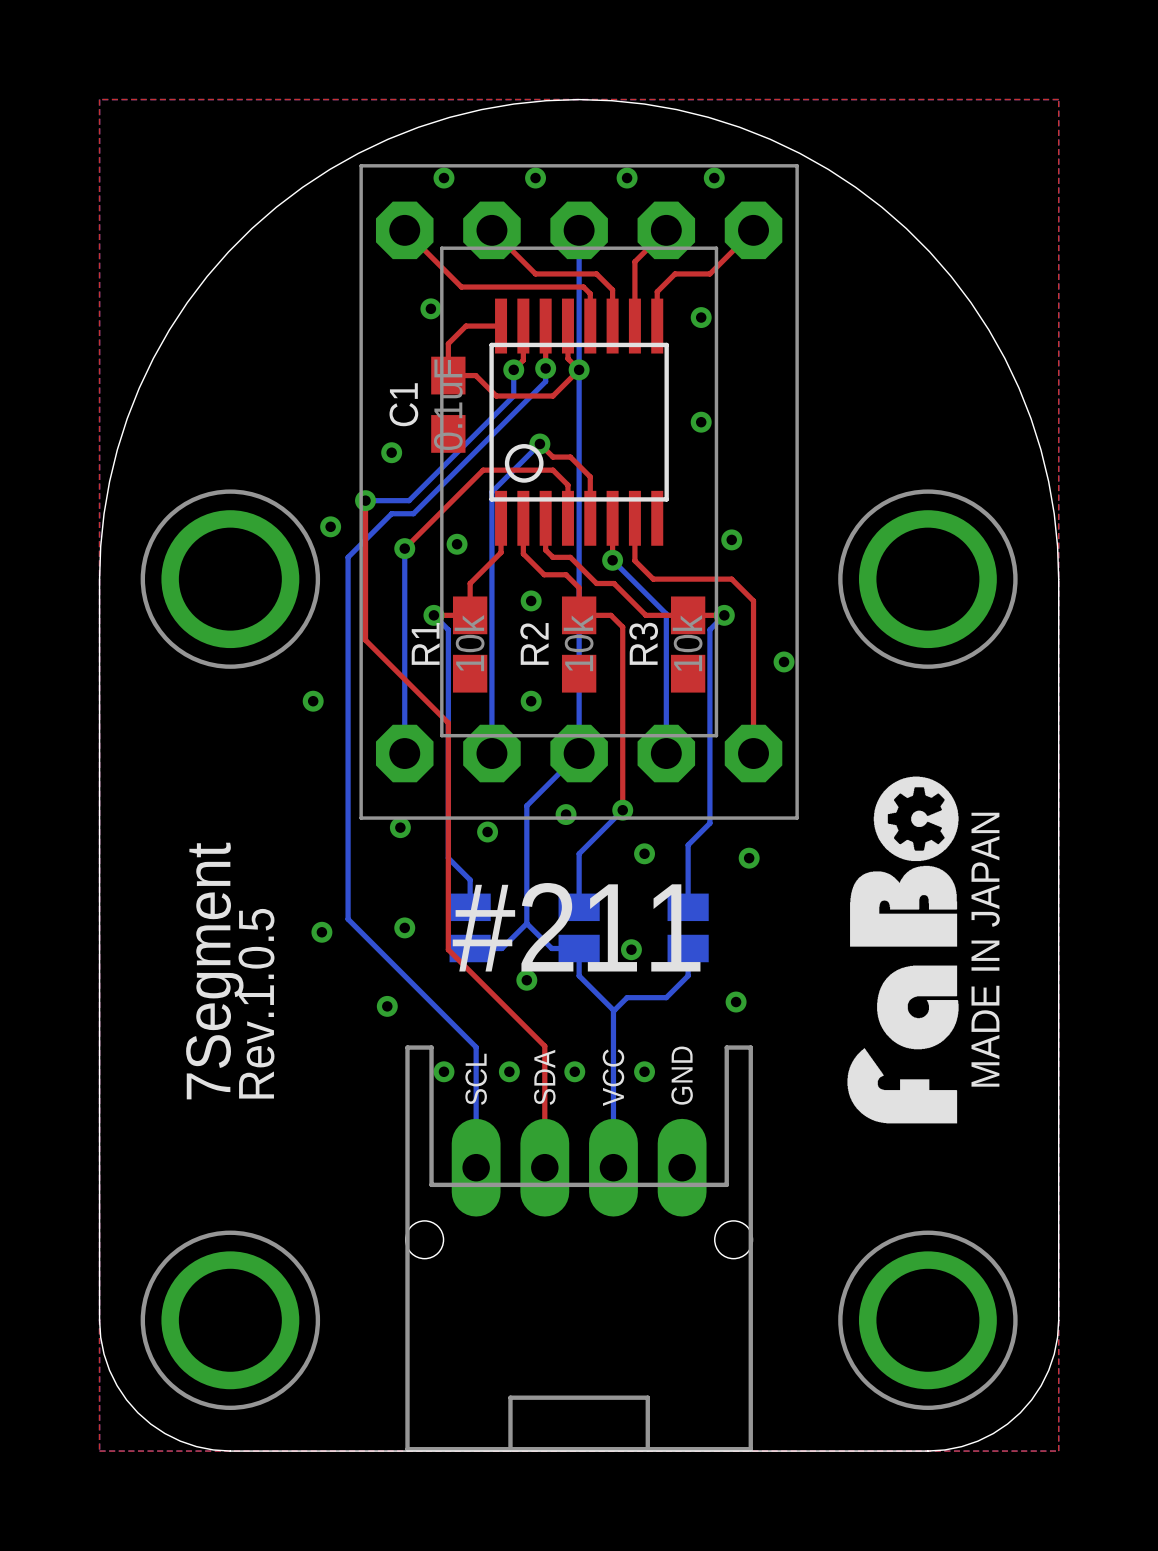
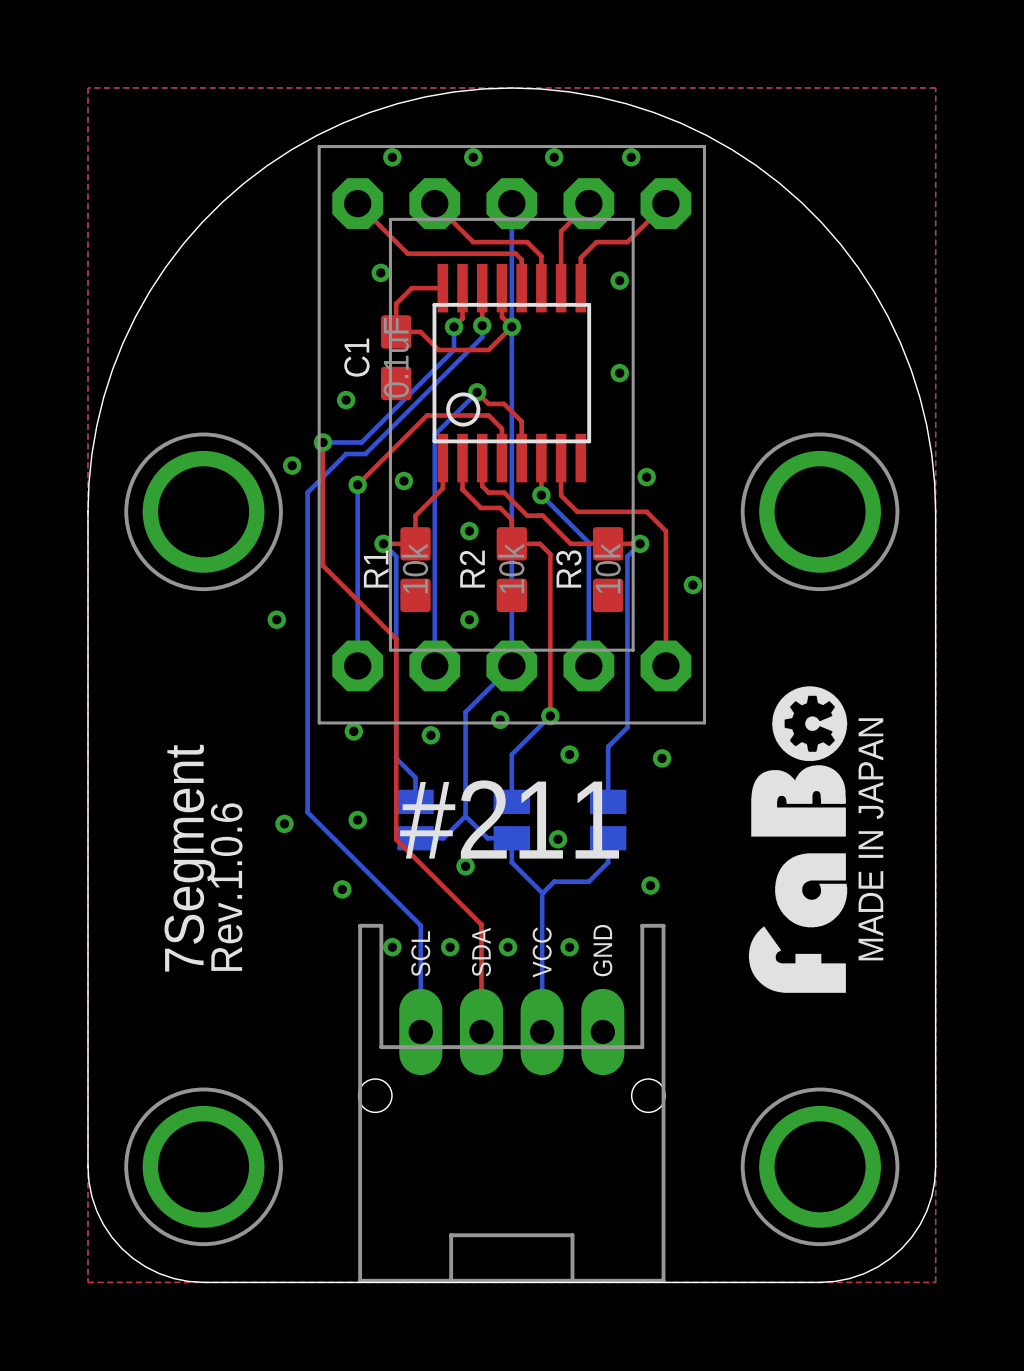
C1 footprint: [431, 356, 466, 453] -> [381, 315, 412, 401]
R1 footprint: [452, 596, 488, 693] -> [400, 527, 431, 613]
R2 footprint: [561, 596, 597, 693] -> [496, 527, 527, 613]
R3 footprint: [670, 596, 706, 693] -> [592, 527, 624, 613]
text: Rev.1.0.5 (256, 1003) -> Rev.1.0.6 (226, 887)

